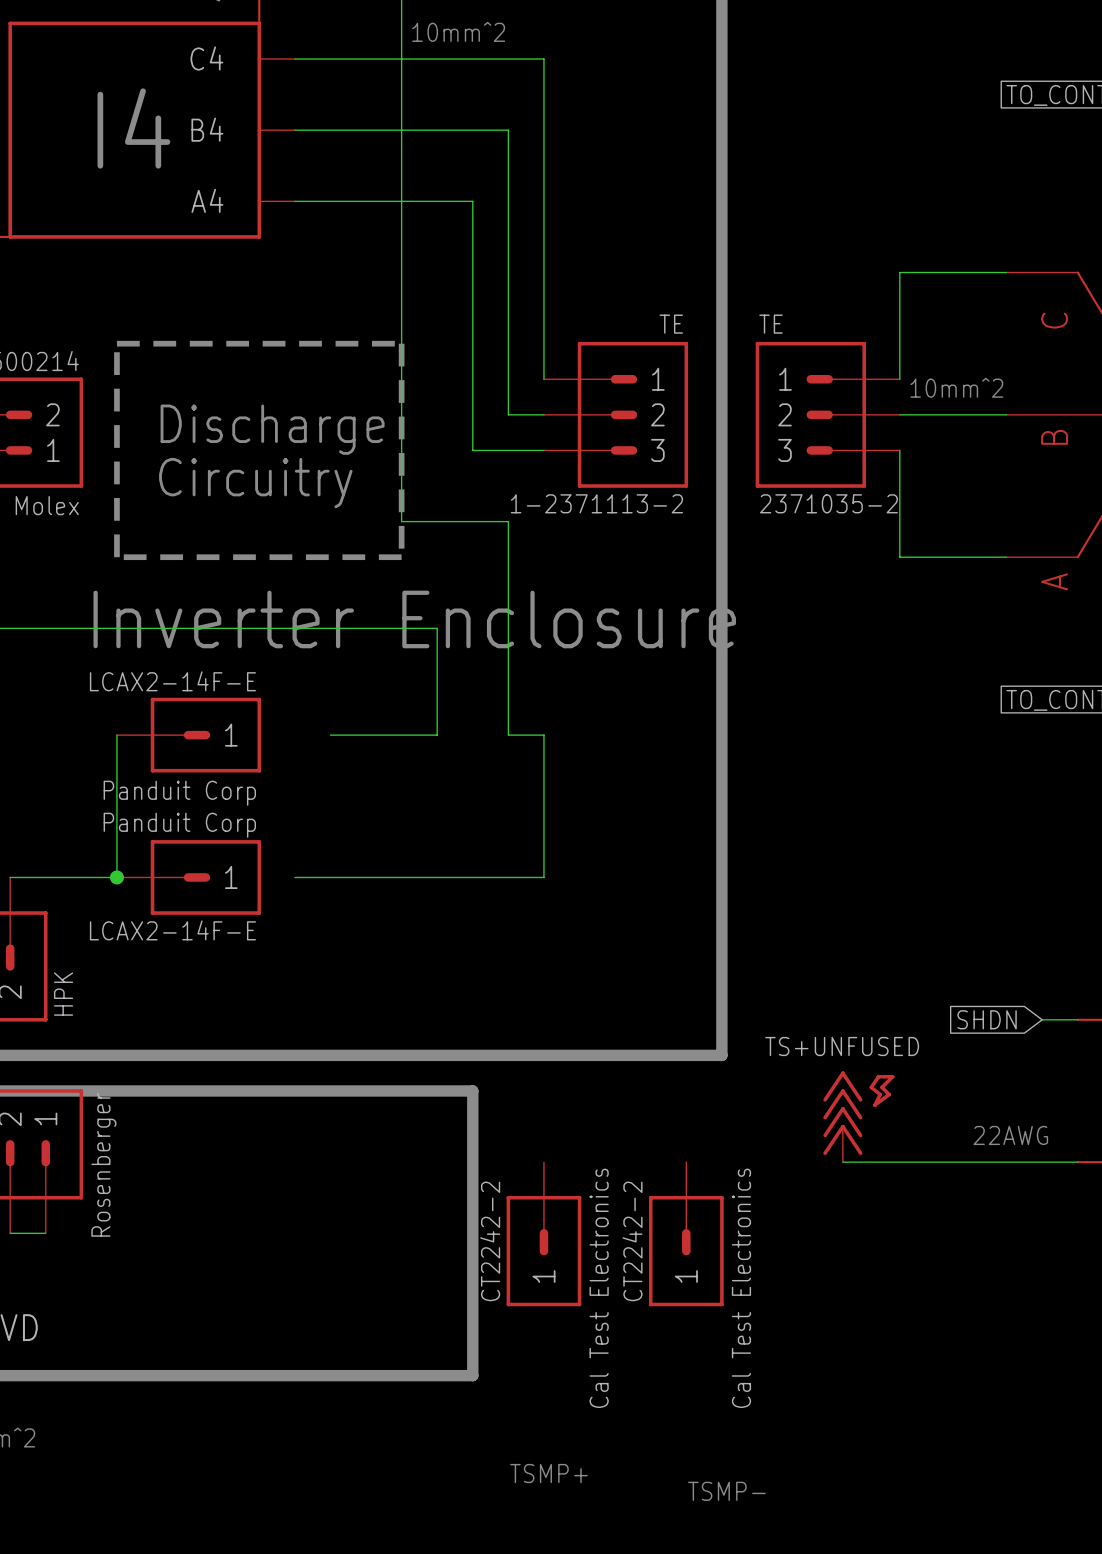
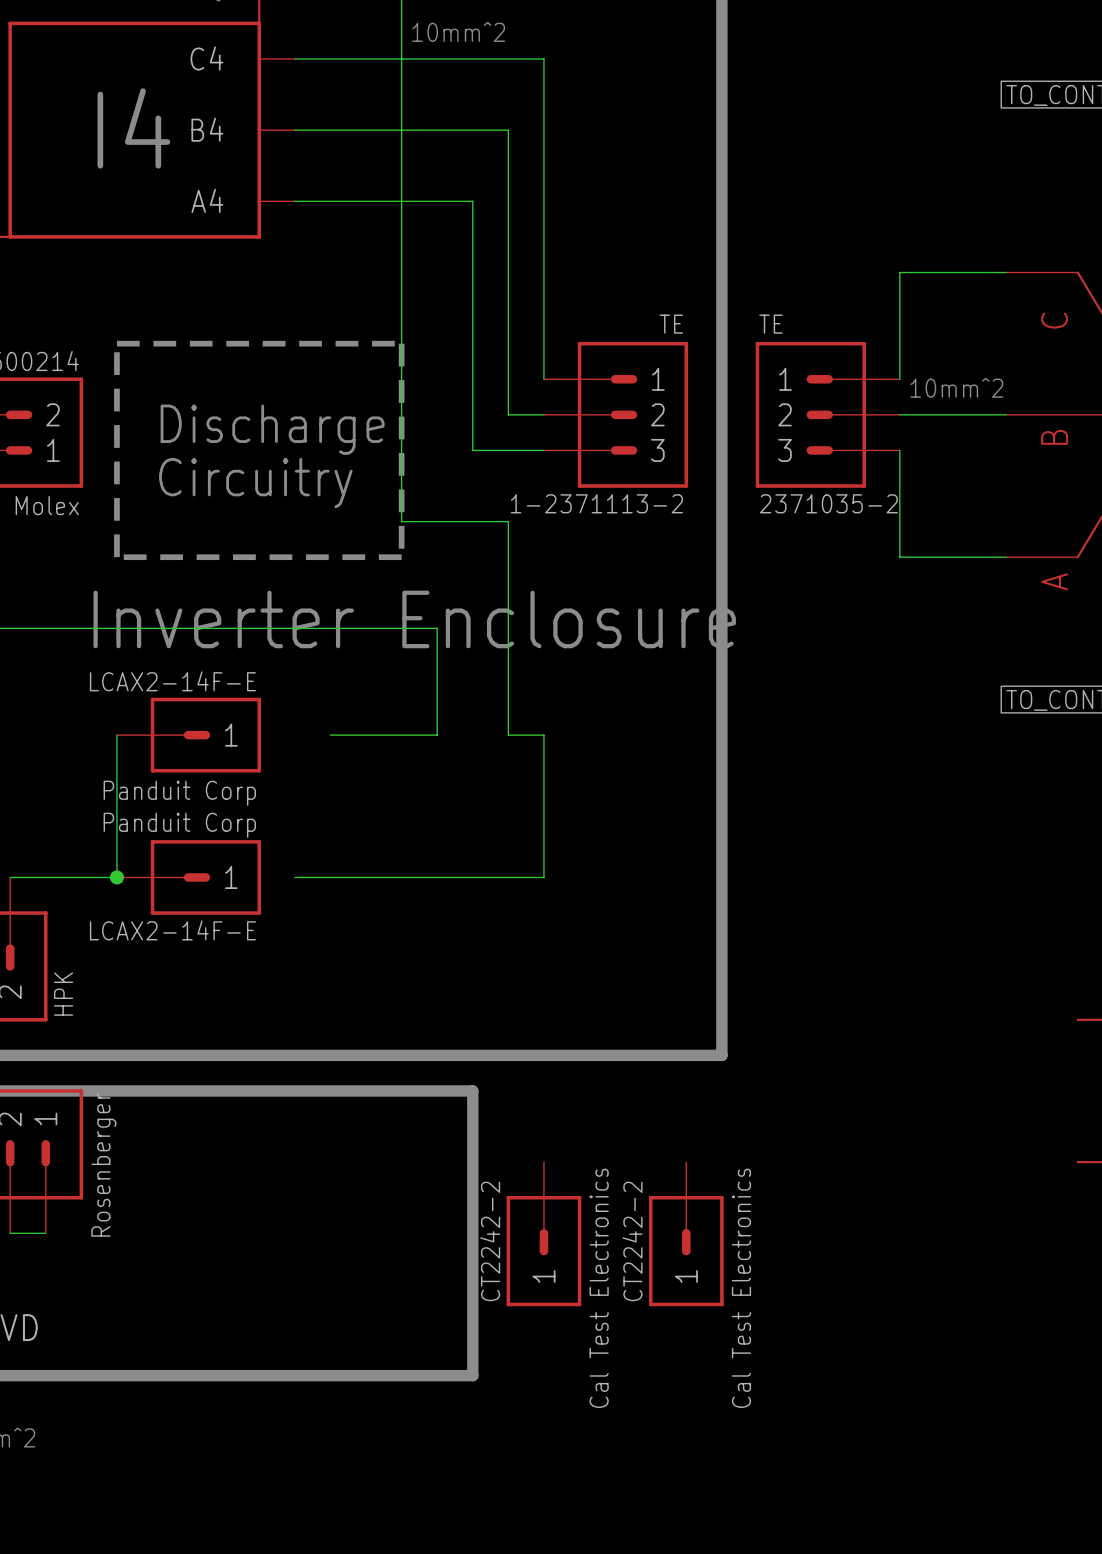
global label: SHDN (987, 1019) -> none
wire: (1042, 1019) (1077, 1019) -> none
power symbol: TS+UNFUSED (858, 1116) -> none
text: 22AWG (1010, 1135) -> none
wire: (842, 1162) (1077, 1162) -> none
text: TSMP+ (548, 1473) -> none
text: TSMP- (726, 1491) -> none

